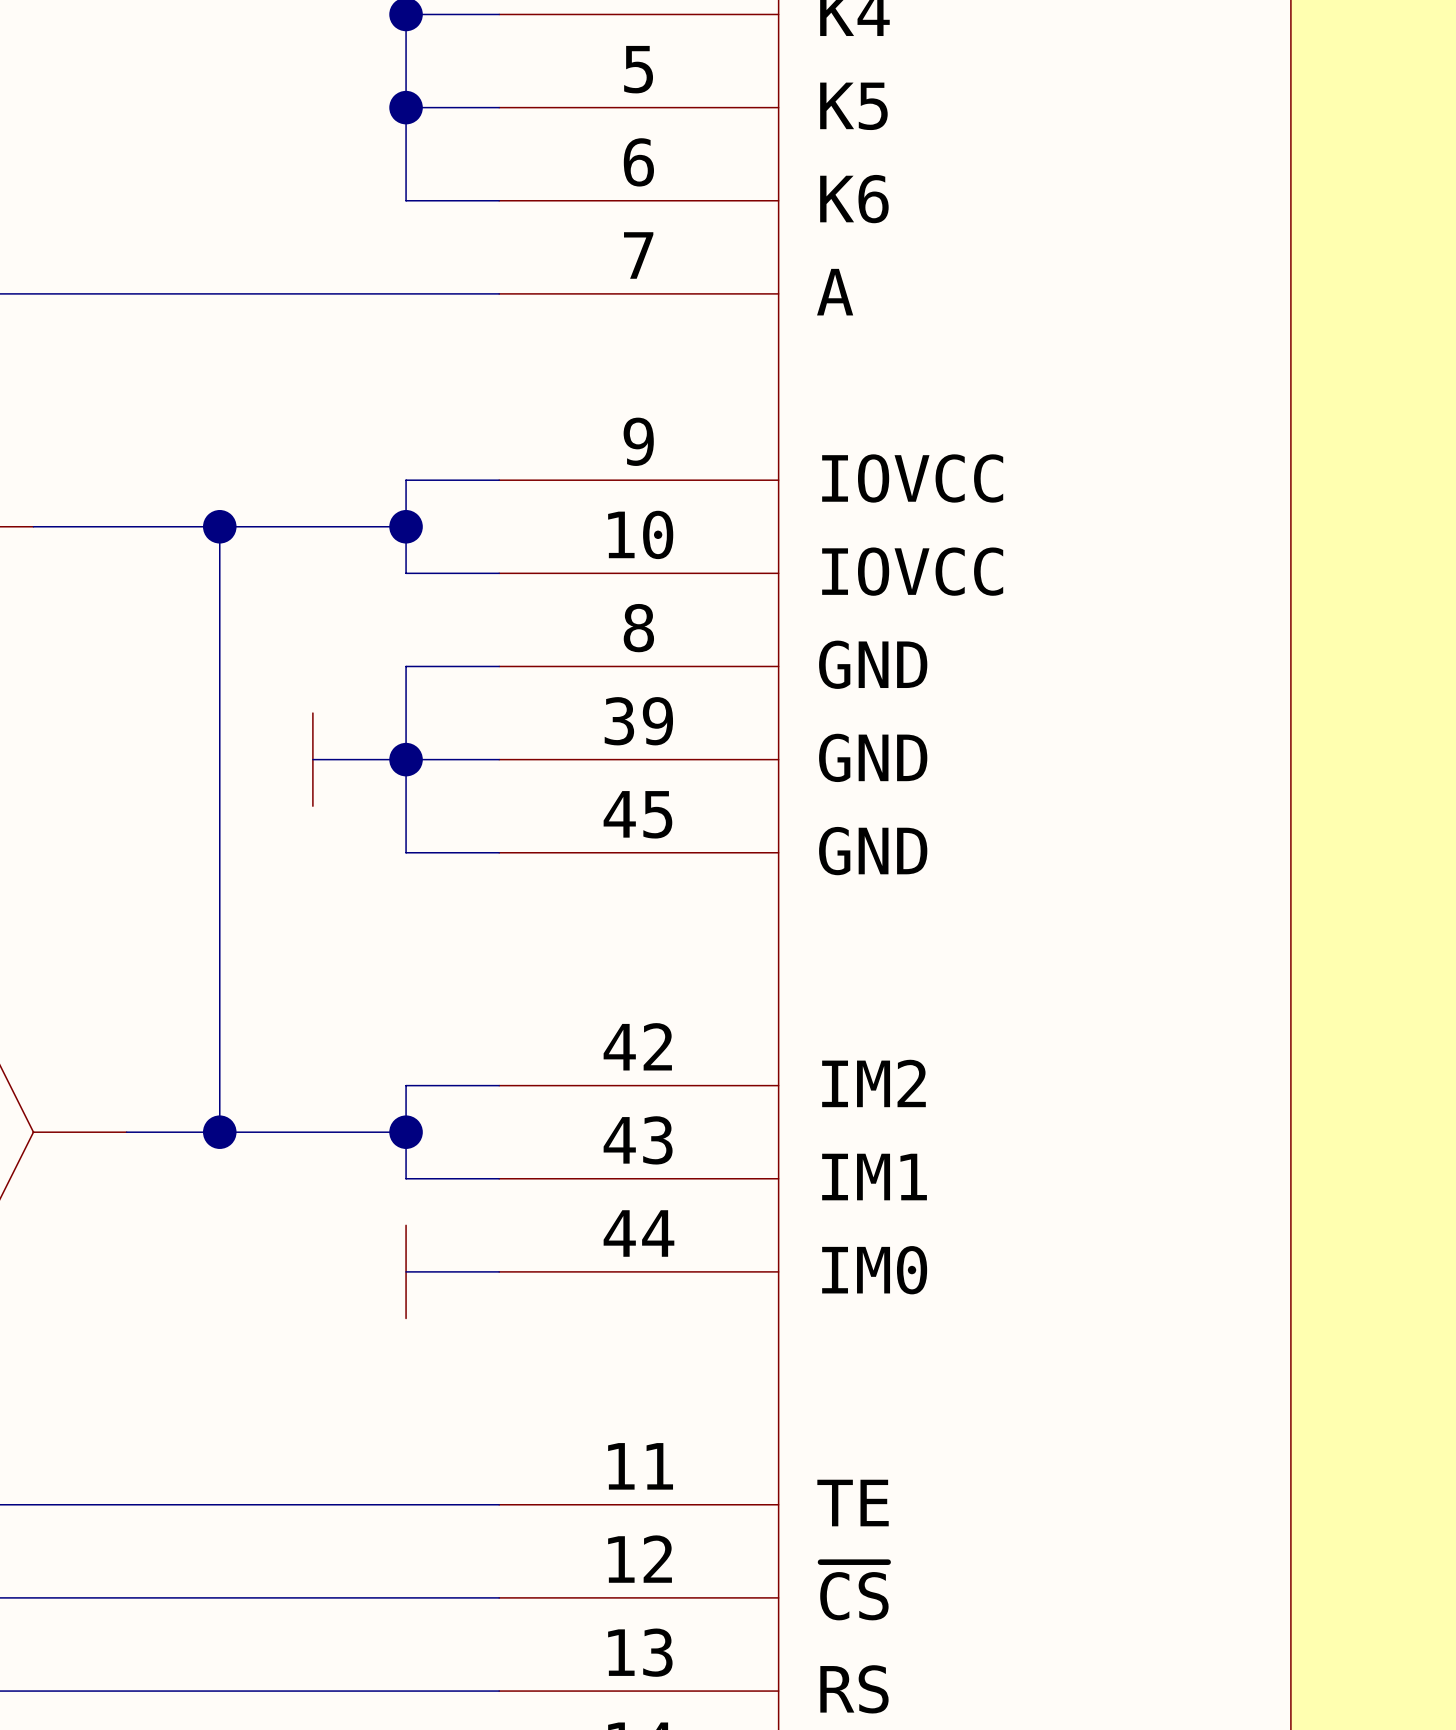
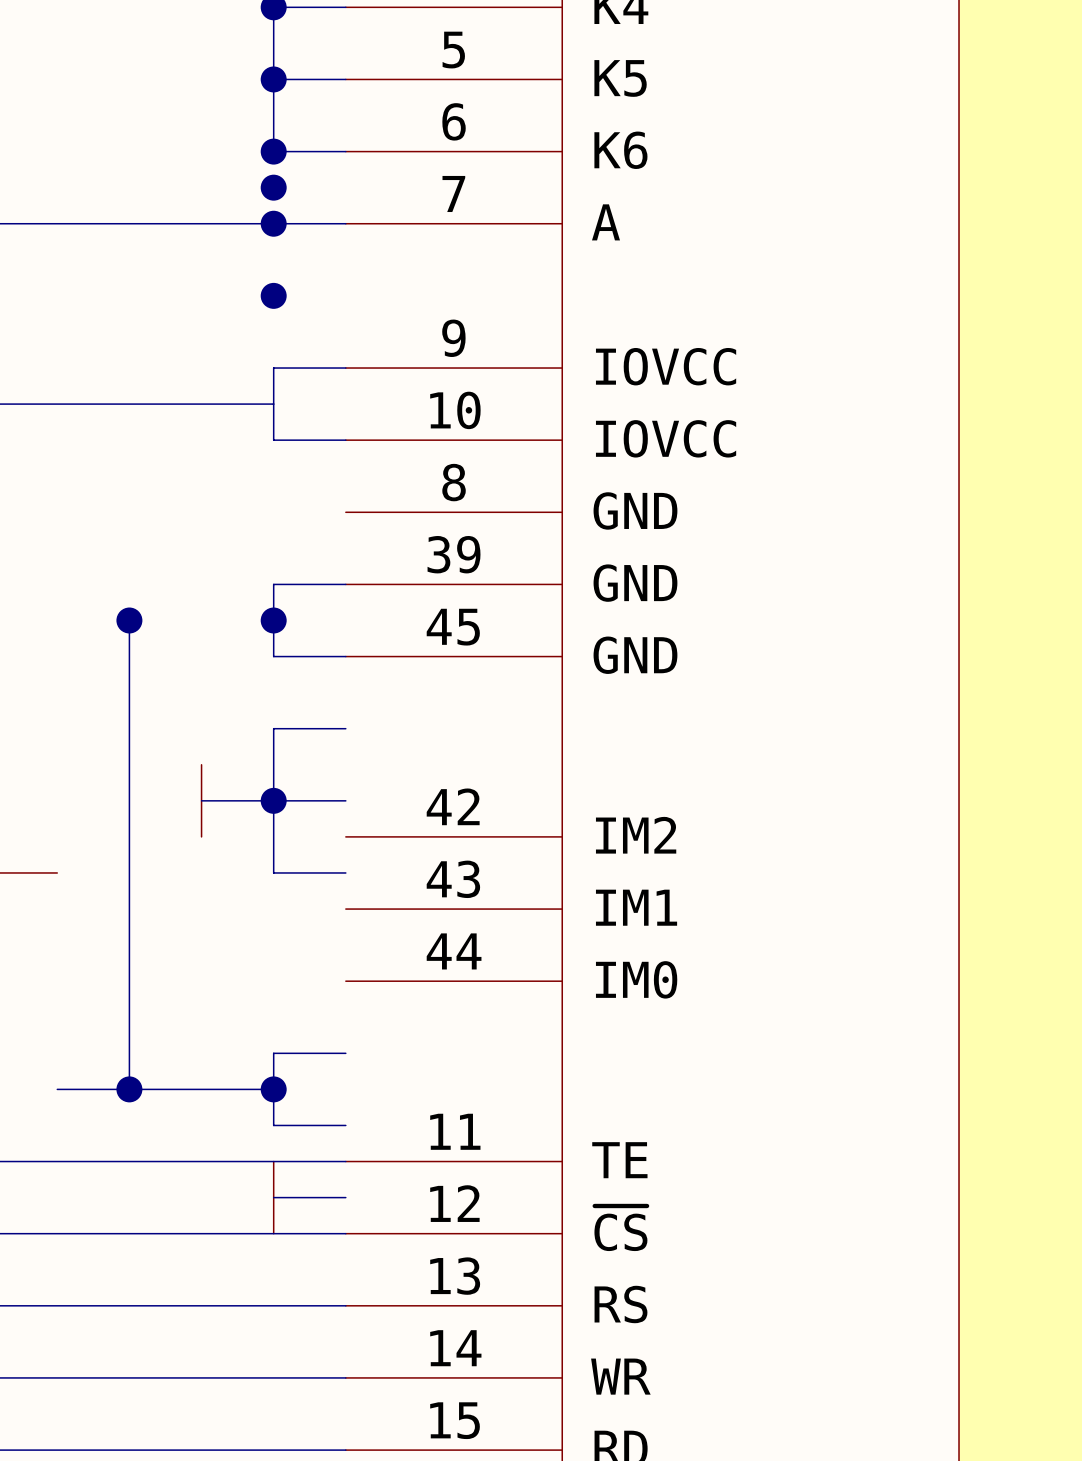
junction: none -> (273, 151)
junction: none -> (273, 187)
junction: none -> (273, 223)
junction: none -> (273, 295)
wire: (219, 526) (219, 806) -> (129, 872) (129, 1089)
junction: (219, 526) -> none
junction: (406, 526) -> none
wire: (499, 666) (406, 666) (406, 759) (312, 759) -> none
power symbol: (312, 759) -> none
junction position: (406, 759) -> (273, 620)
junction: none -> (129, 620)
wire: none -> (201, 800) (345, 800)
power symbol: none -> (201, 800)
wire: (406, 1085) (499, 1085) -> (273, 836) (273, 728) (345, 728)
wire: (126, 1132) (406, 1132) (406, 1178) (499, 1178) -> none
junction: (219, 1132) -> none
wire: none -> (273, 872) (345, 872)
junction position: (406, 1132) -> (273, 800)
wire: (406, 1271) (499, 1271) -> (273, 1197) (345, 1197)
power symbol: (406, 1271) -> none
wire: none -> (345, 1053) (273, 1053) (273, 1125) (345, 1125)
wire: none -> (57, 1089) (273, 1089)
junction: none -> (129, 1089)
junction: none -> (273, 1089)
power symbol: none -> (273, 1197)

